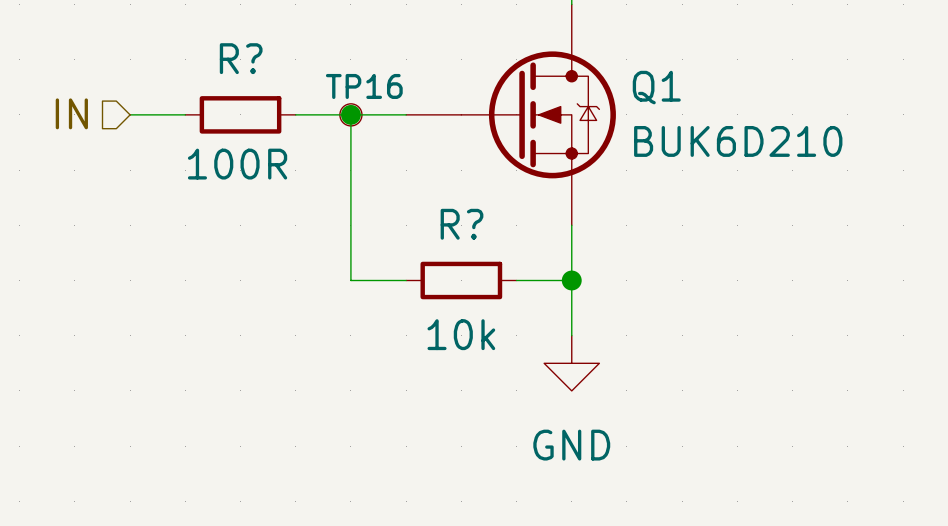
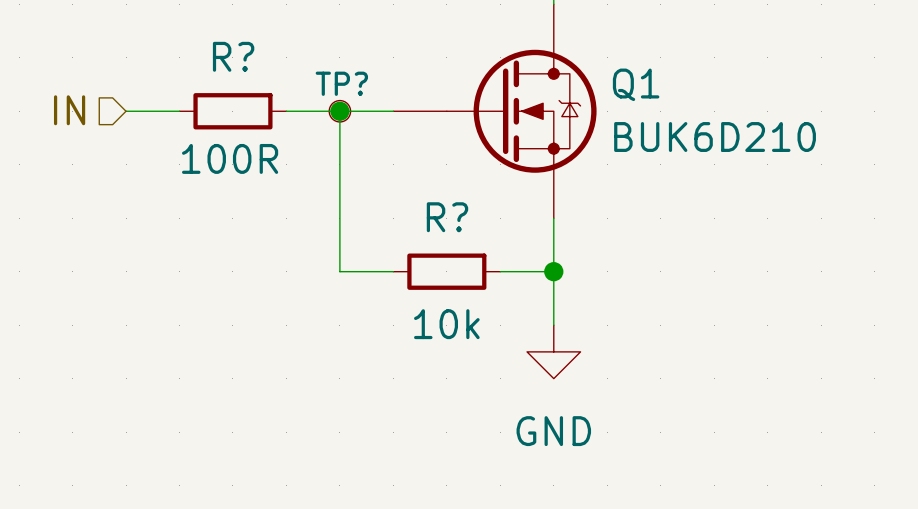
TP16 name: TP16 (364, 86) -> TP? (341, 83)

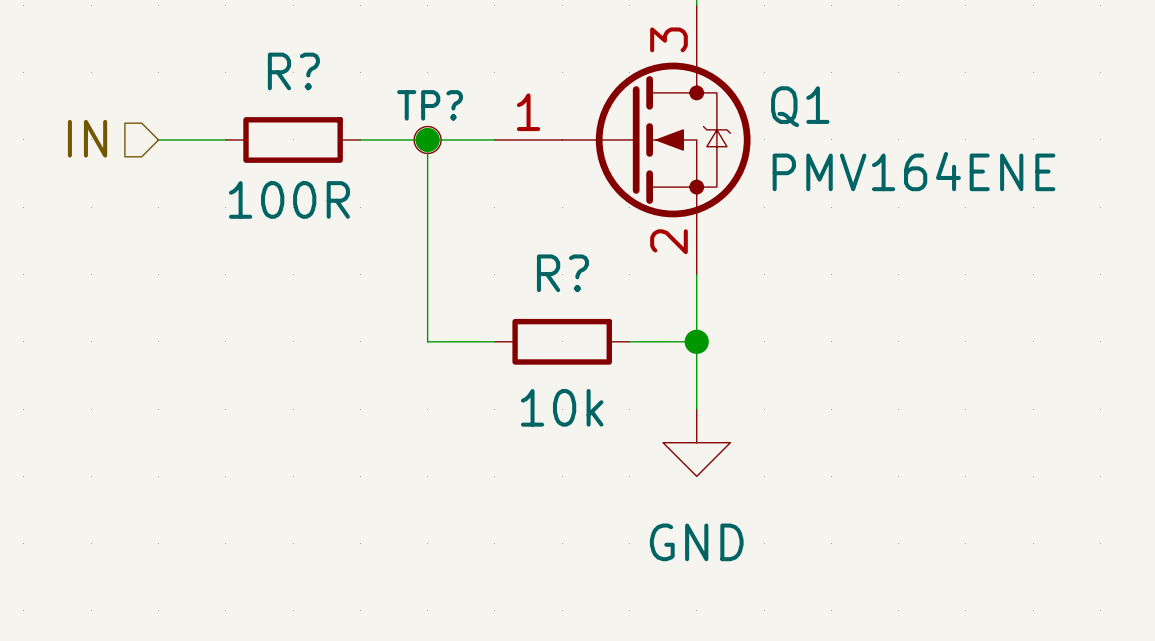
Q1 pin number: none -> 3 (668, 39)
Q1 pin number: none -> 1 (528, 112)
Q1 value: BUK6D210 (715, 137) -> PMV164ENE (914, 171)
Q1 pin number: none -> 2 (668, 241)

